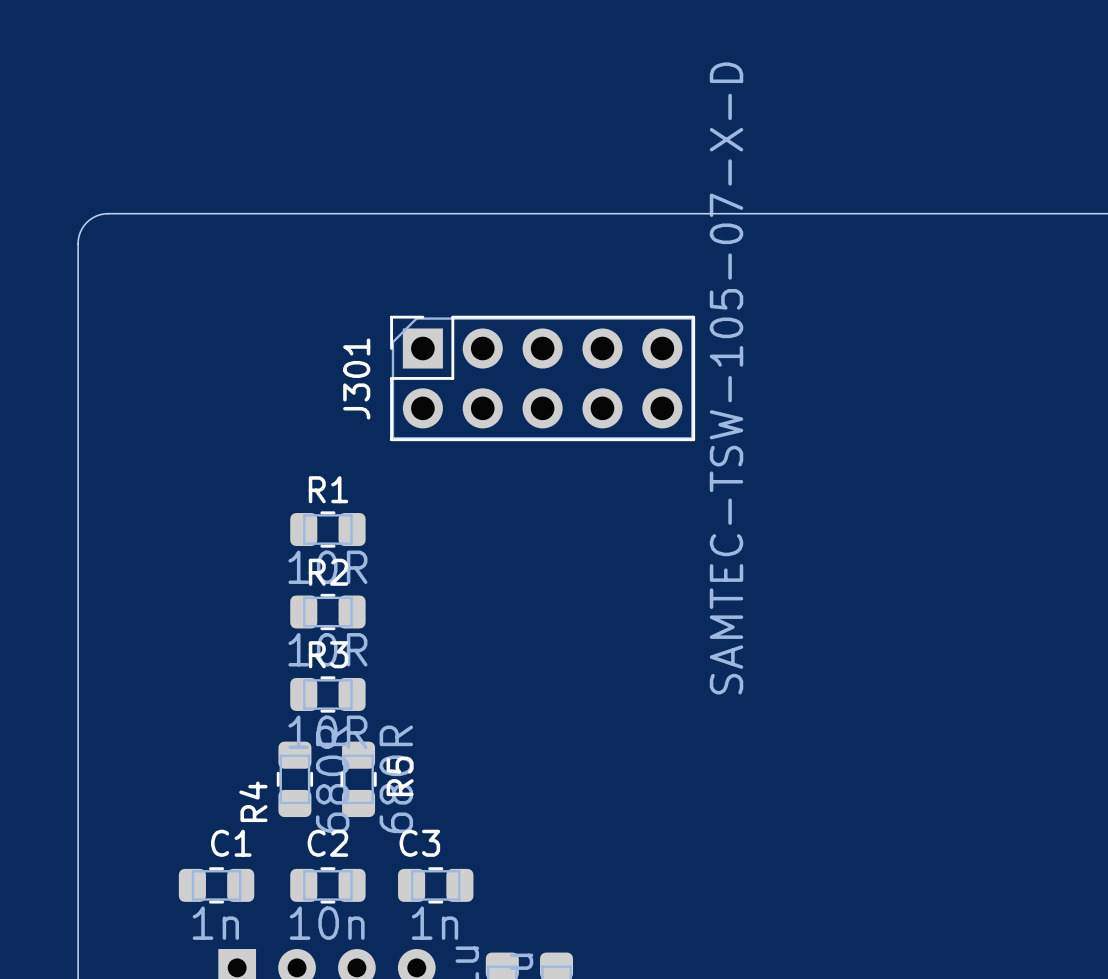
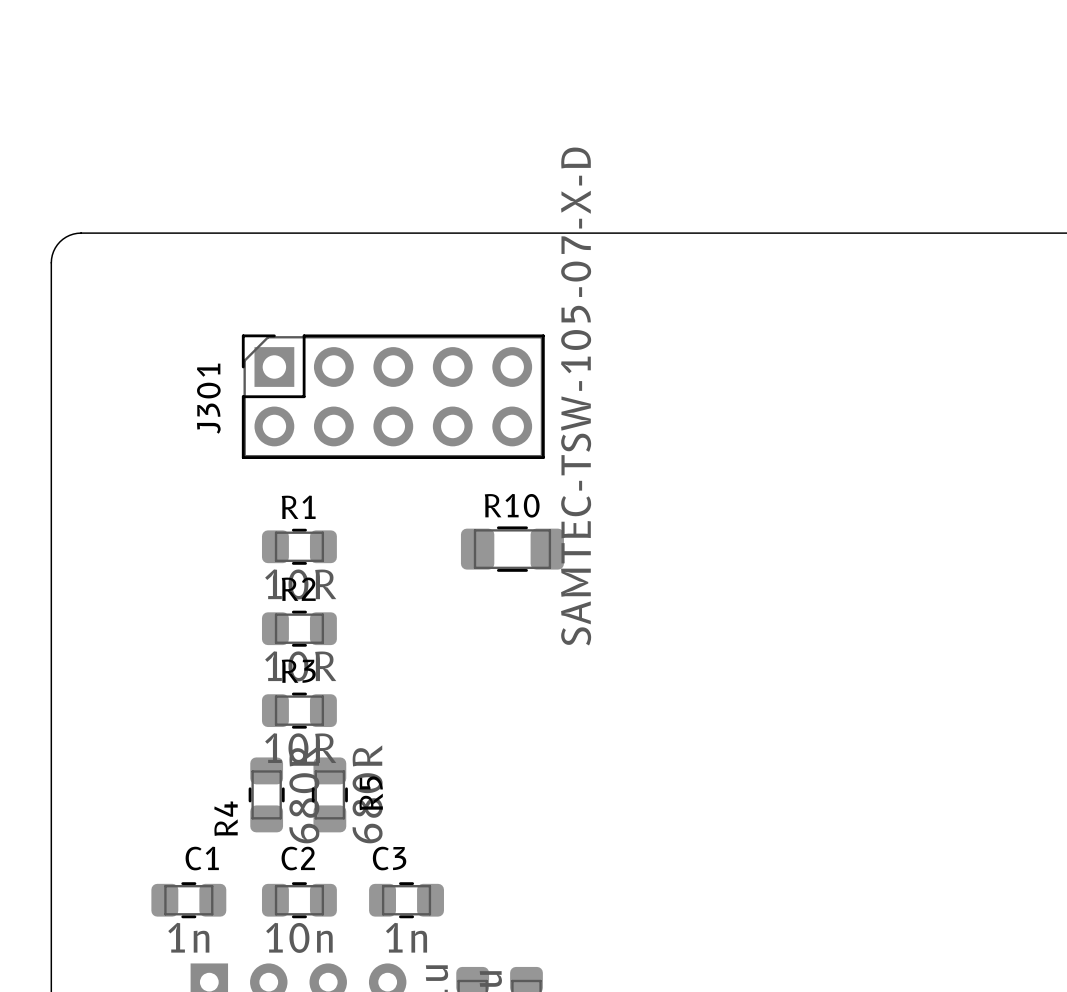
J301 position: (542, 378) -> (393, 396)
R10: none -> (512, 549)

